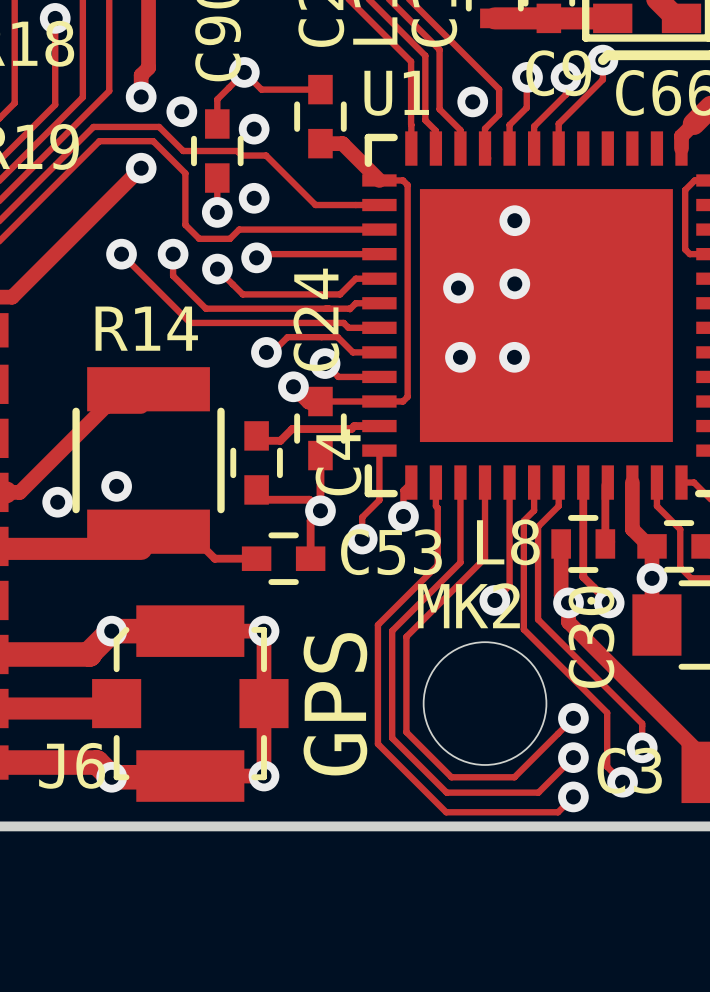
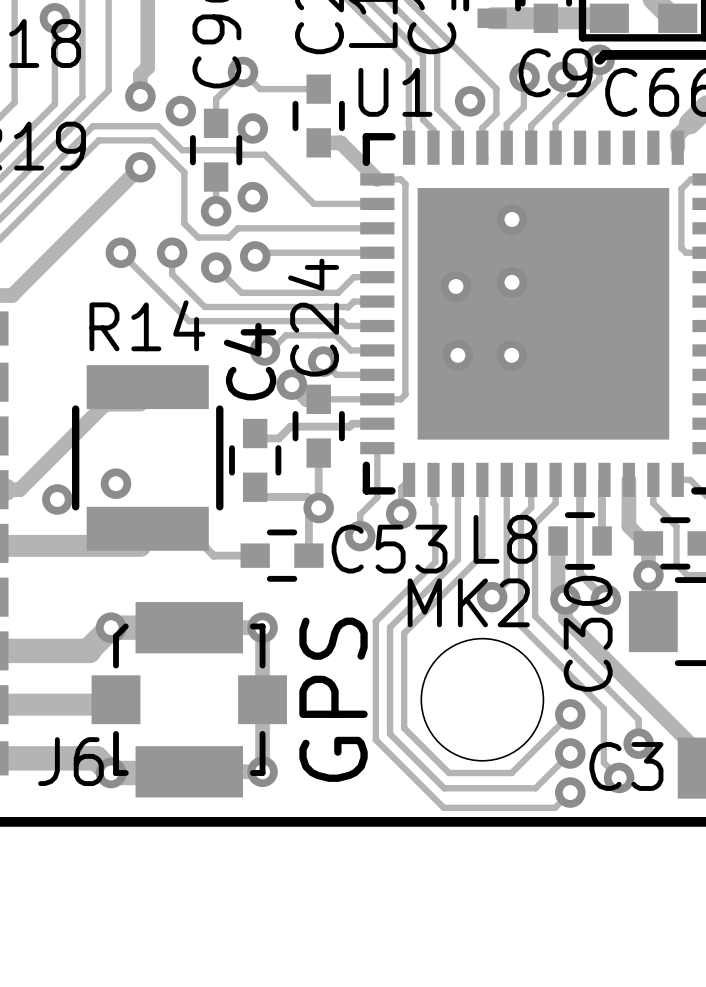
C4 name position: C4 (338, 462) -> C4 (250, 361)

